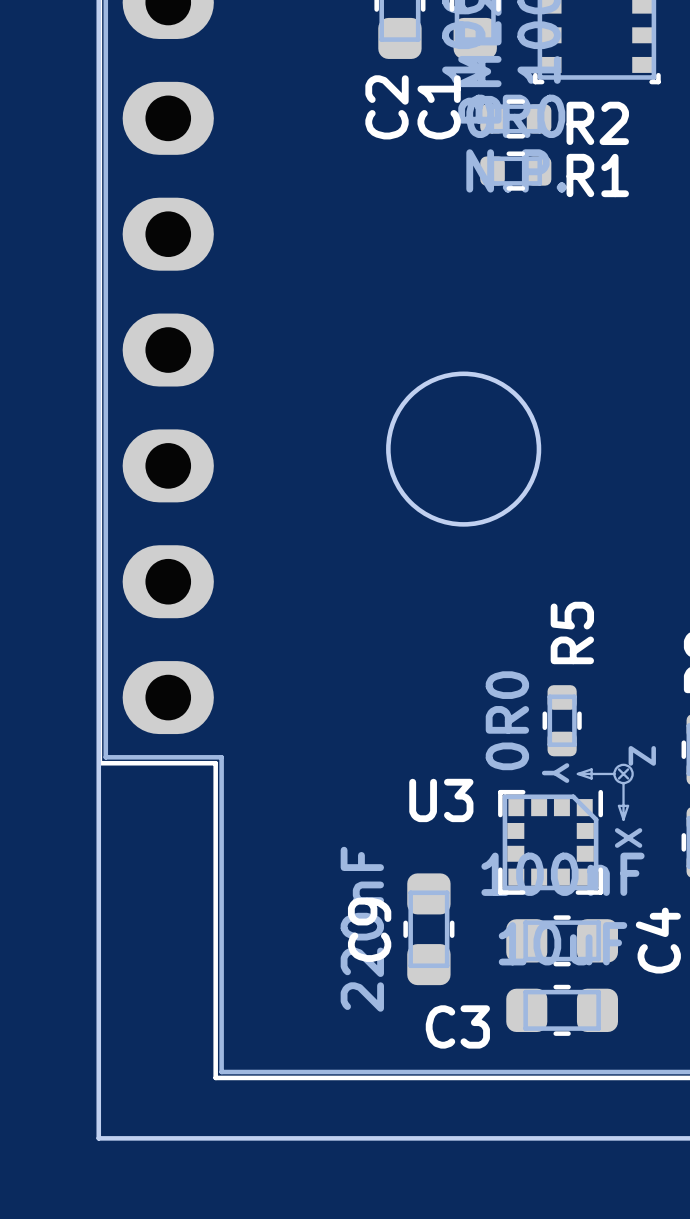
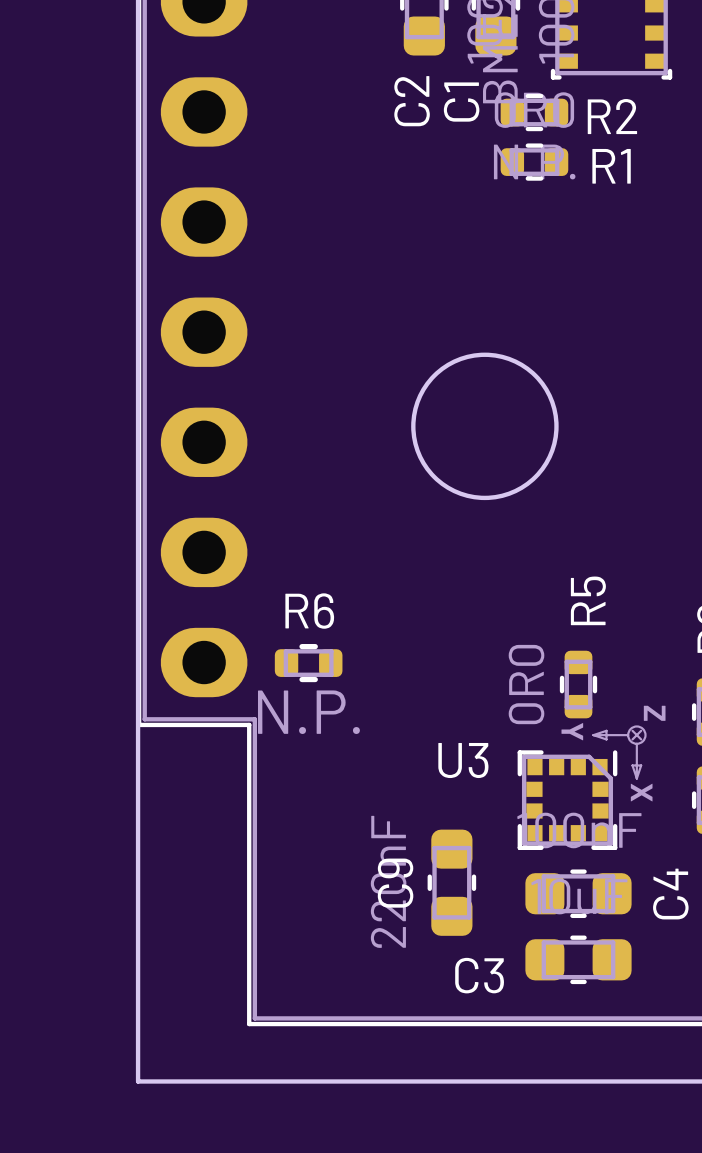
R6: none -> N.P. (308, 663)

